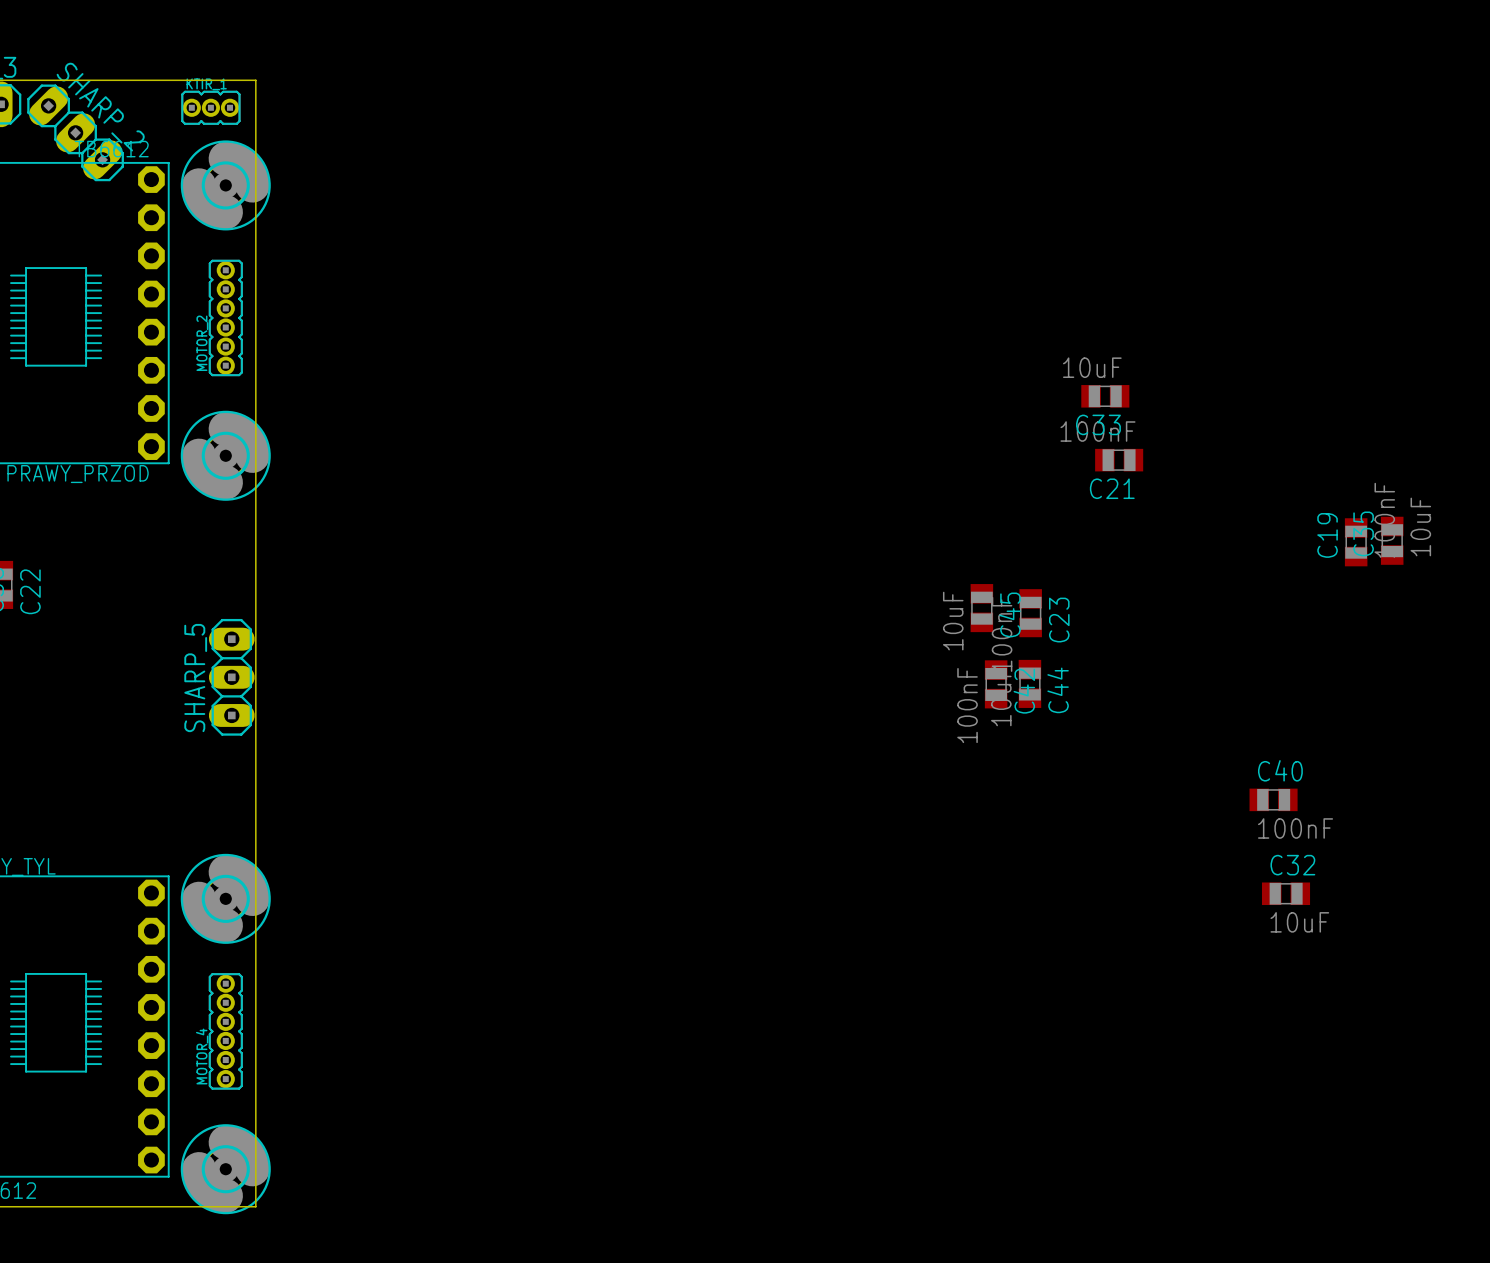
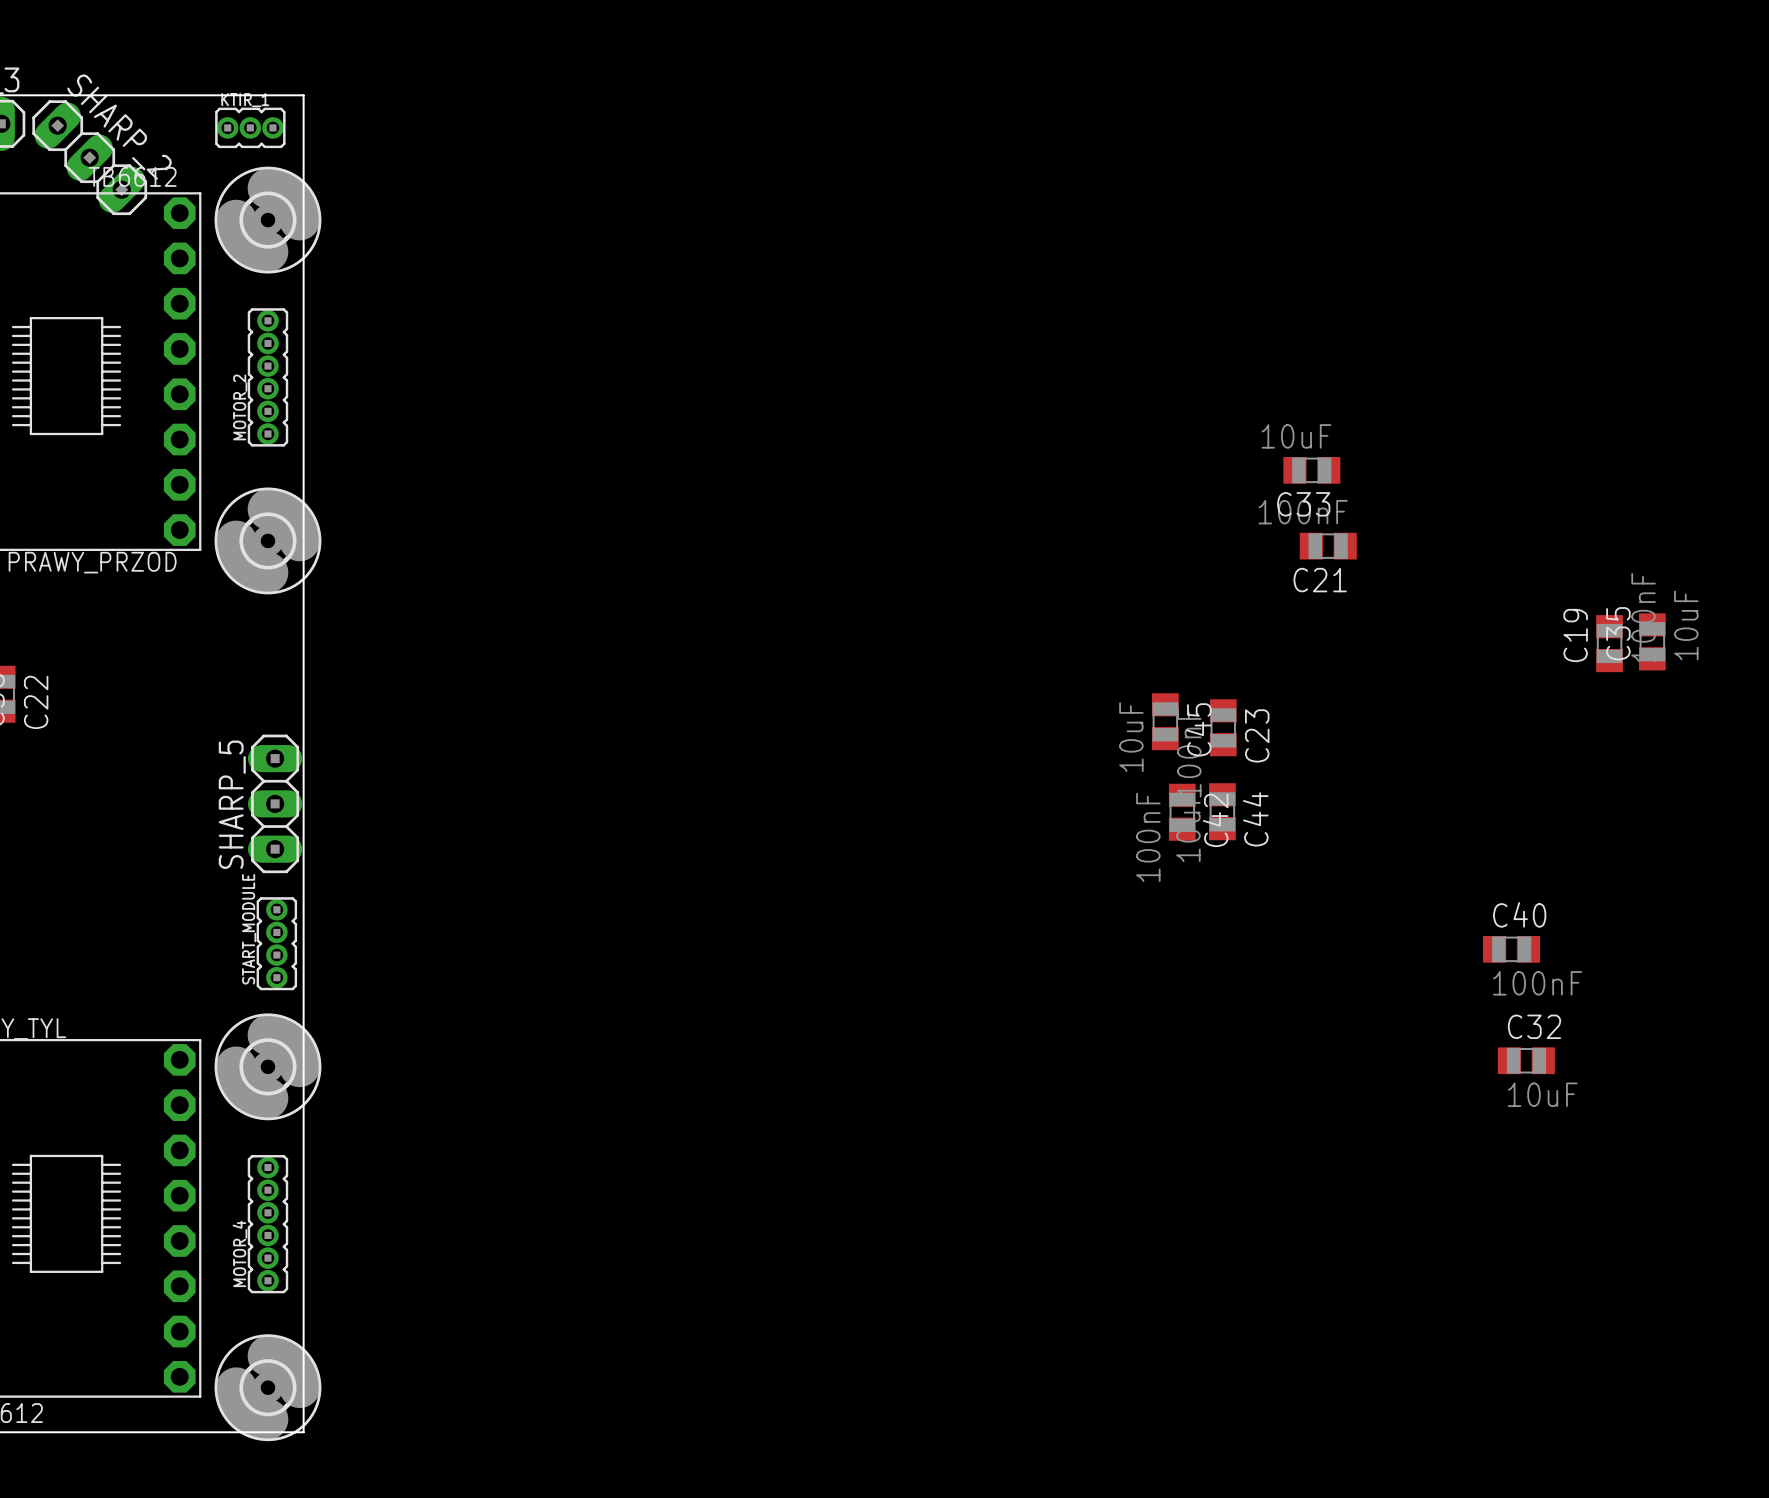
START_MODULE: none -> (276, 943)

